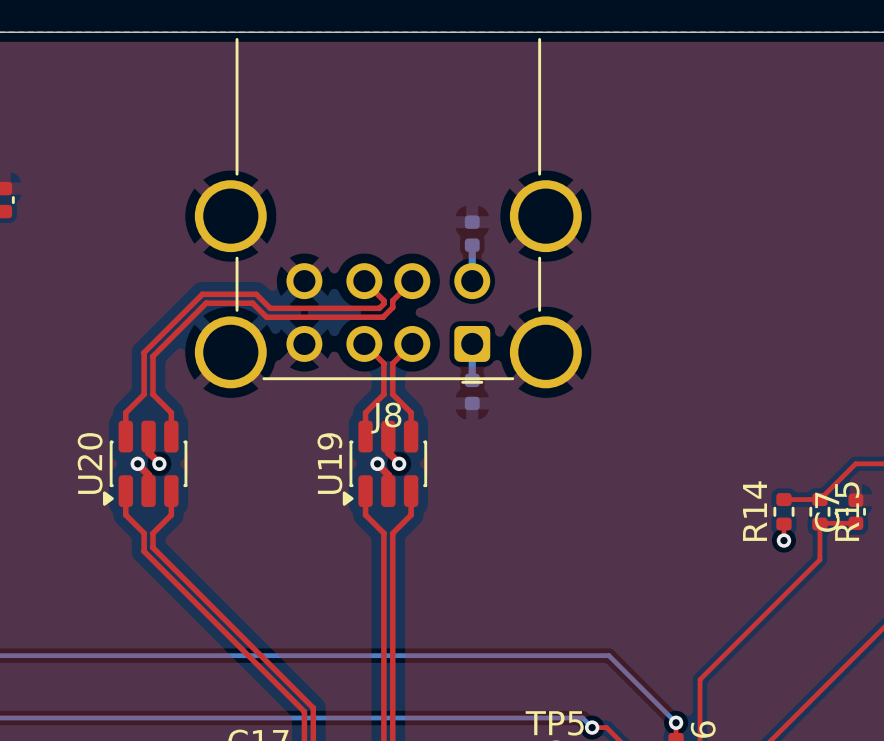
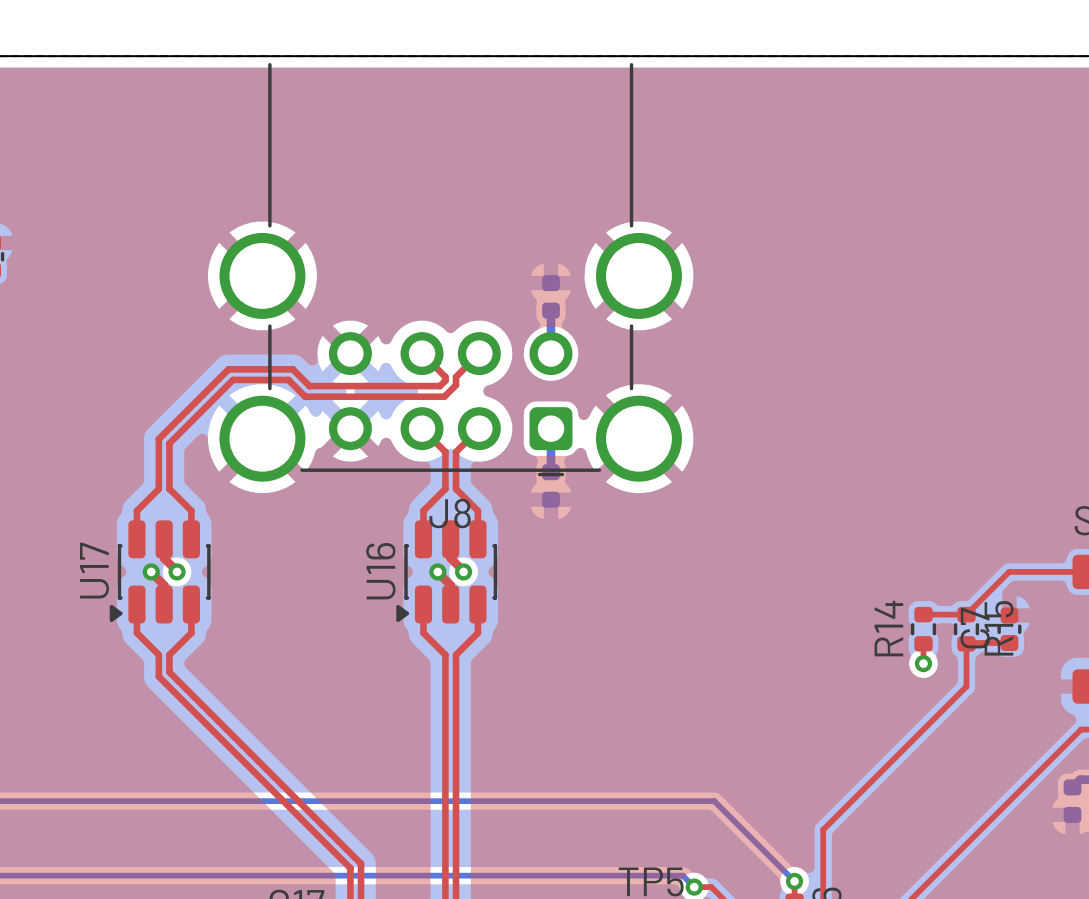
U20 name: U20 (90, 463) -> U17 (94, 570)
U19 name: U19 (329, 463) -> U16 (380, 571)

